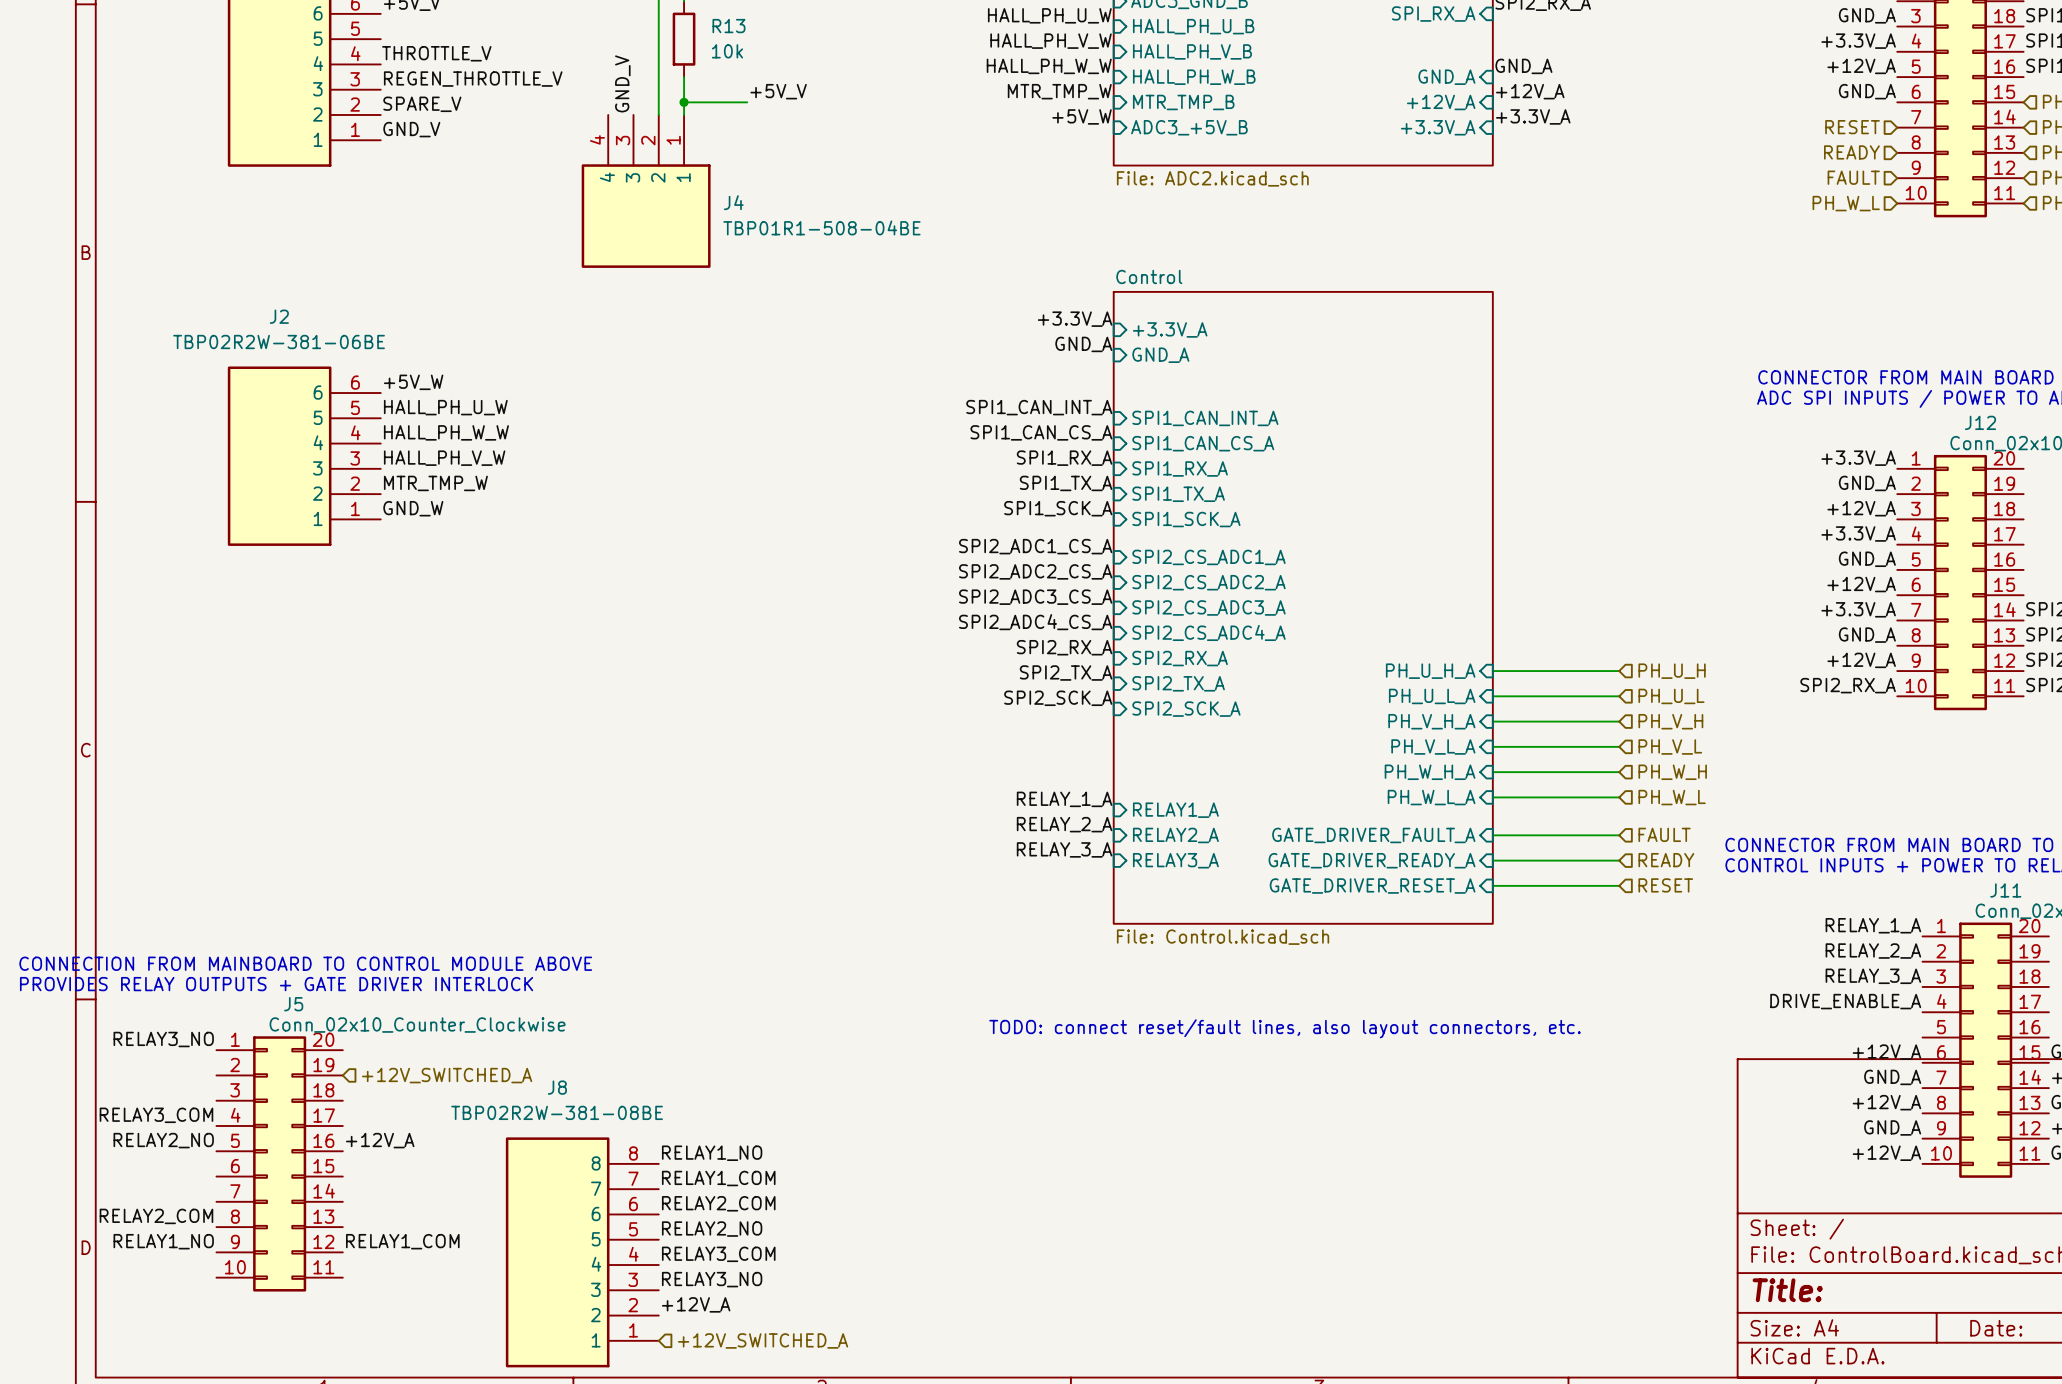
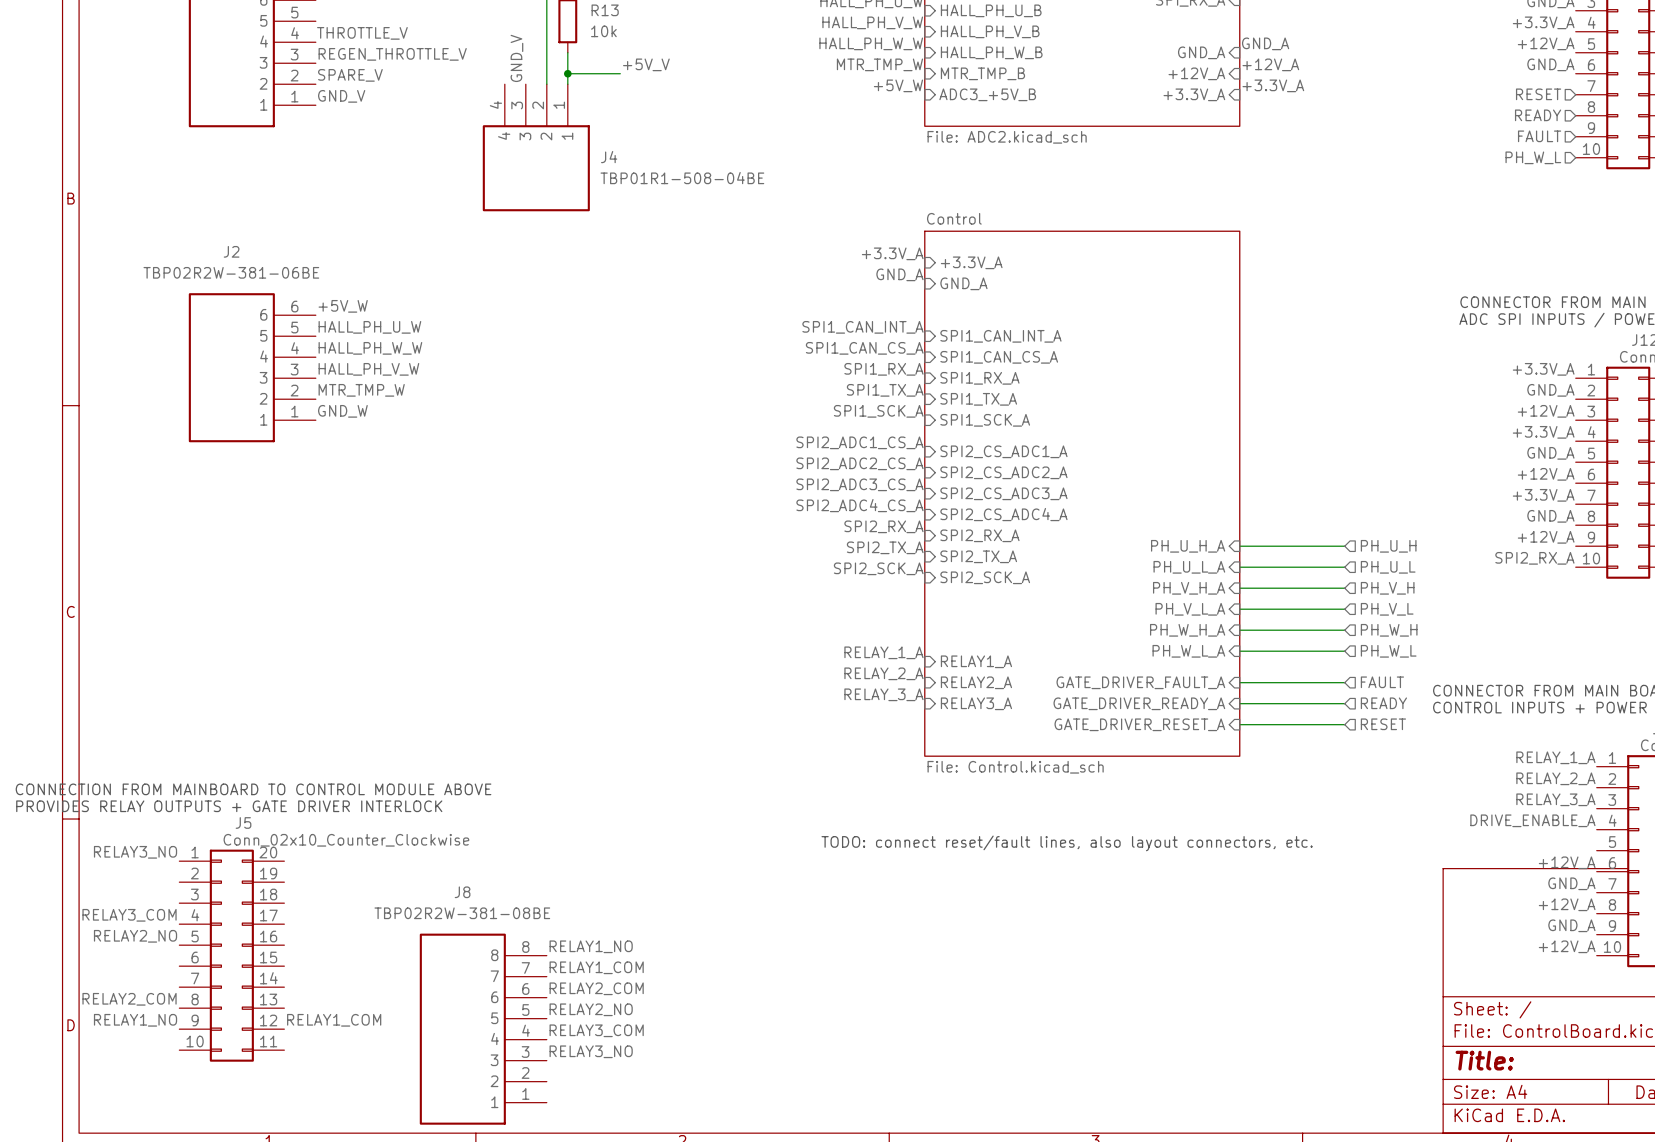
hierarchical label: +12V_SWITCHED_A (447, 1075) -> none
label: +12V_A (380, 1140) -> none
label: +12V_A (696, 1304) -> none
hierarchical label: +12V_SWITCHED_A (763, 1340) -> none

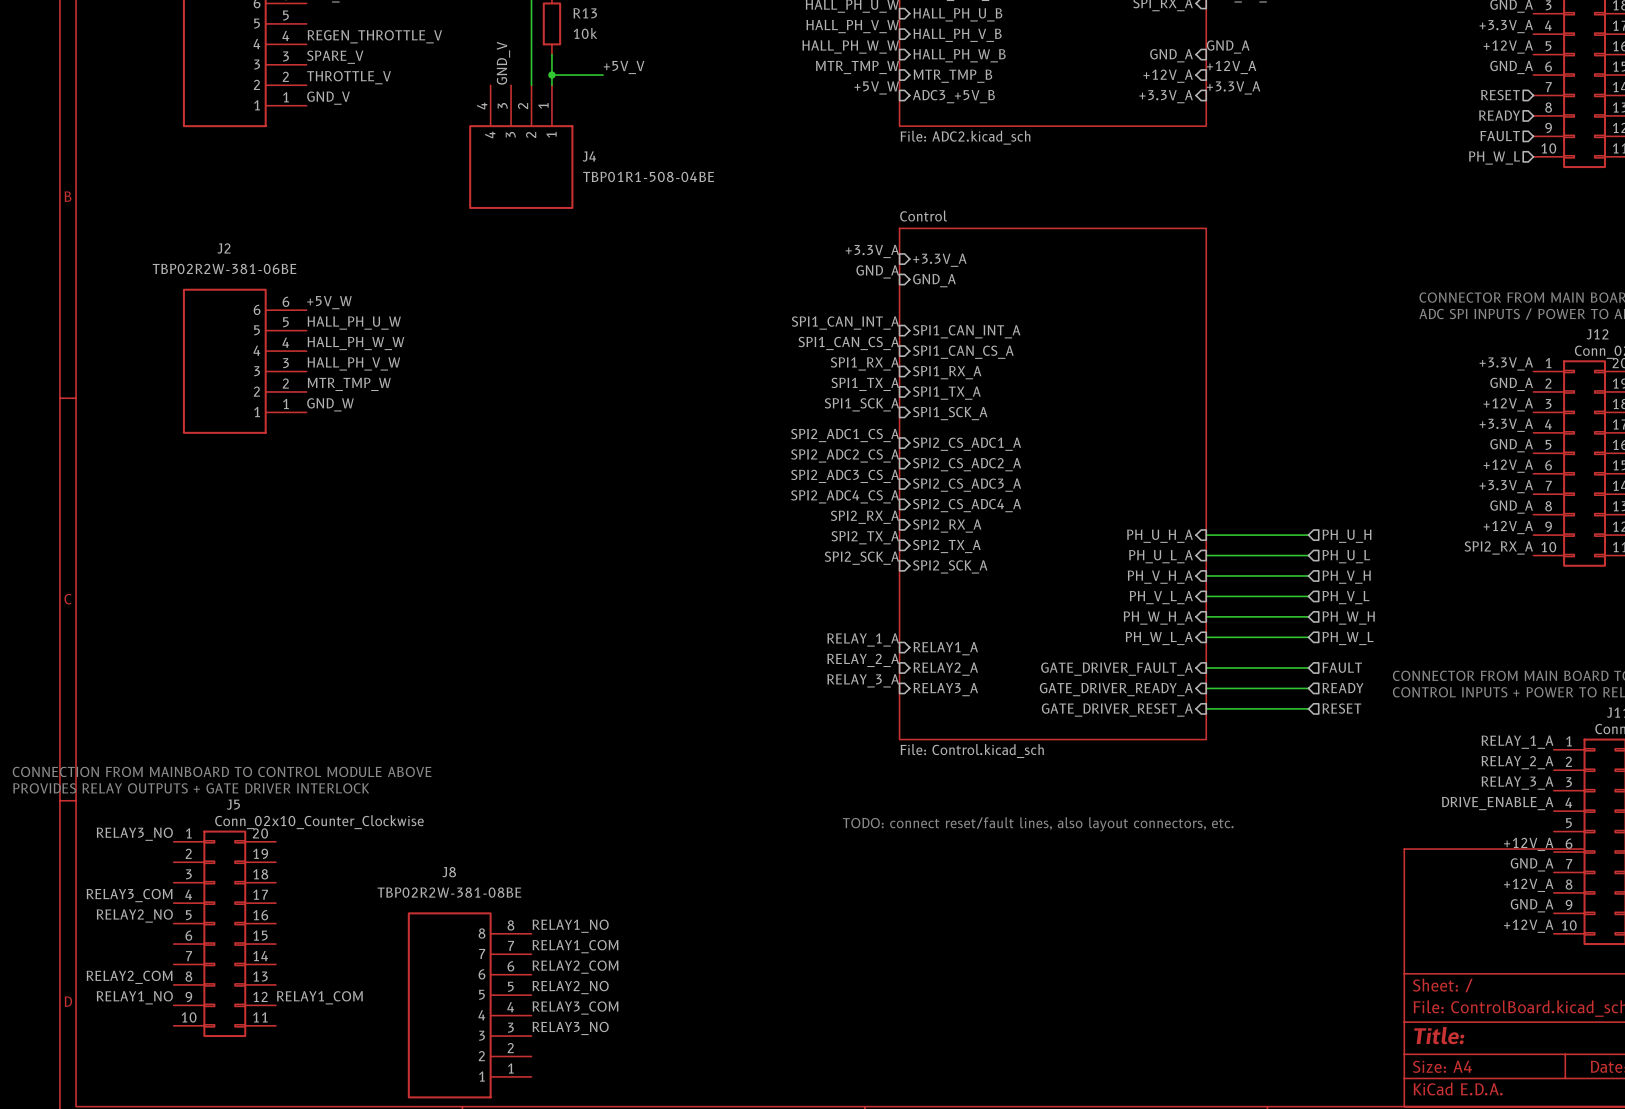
label: THROTTLE_V (362, 33) -> REGEN_THROTTLE_V (374, 36)
label: REGEN_THROTTLE_V (392, 54) -> SPARE_V (335, 57)
label: SPARE_V (350, 75) -> THROTTLE_V (349, 77)

